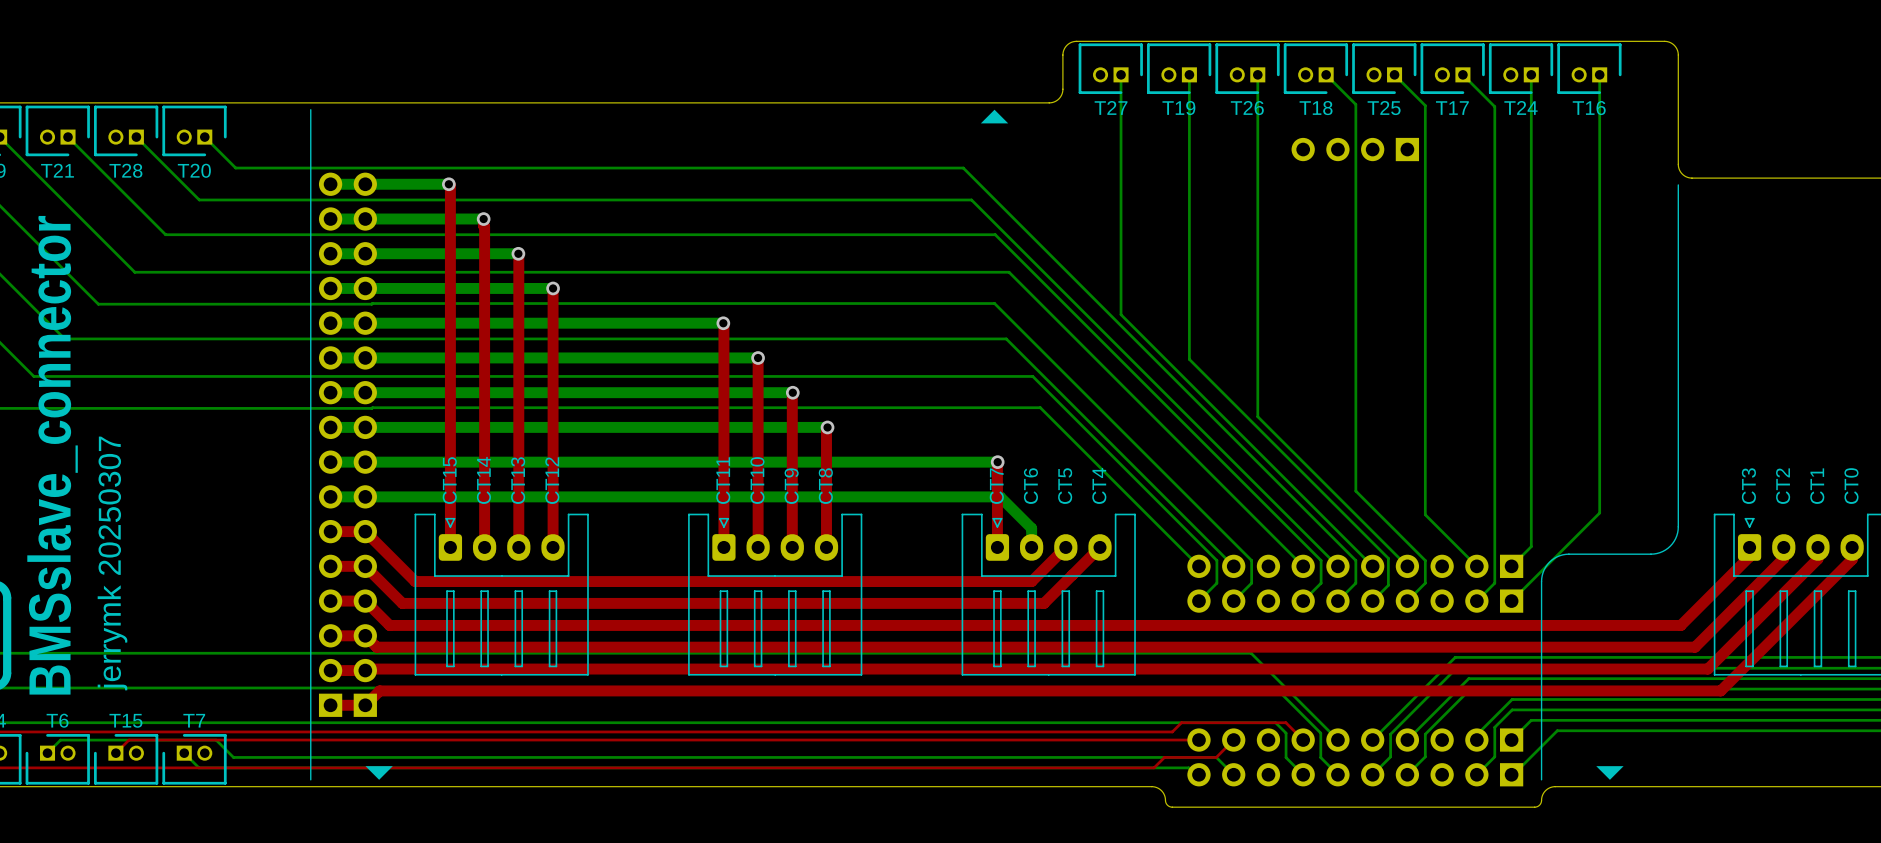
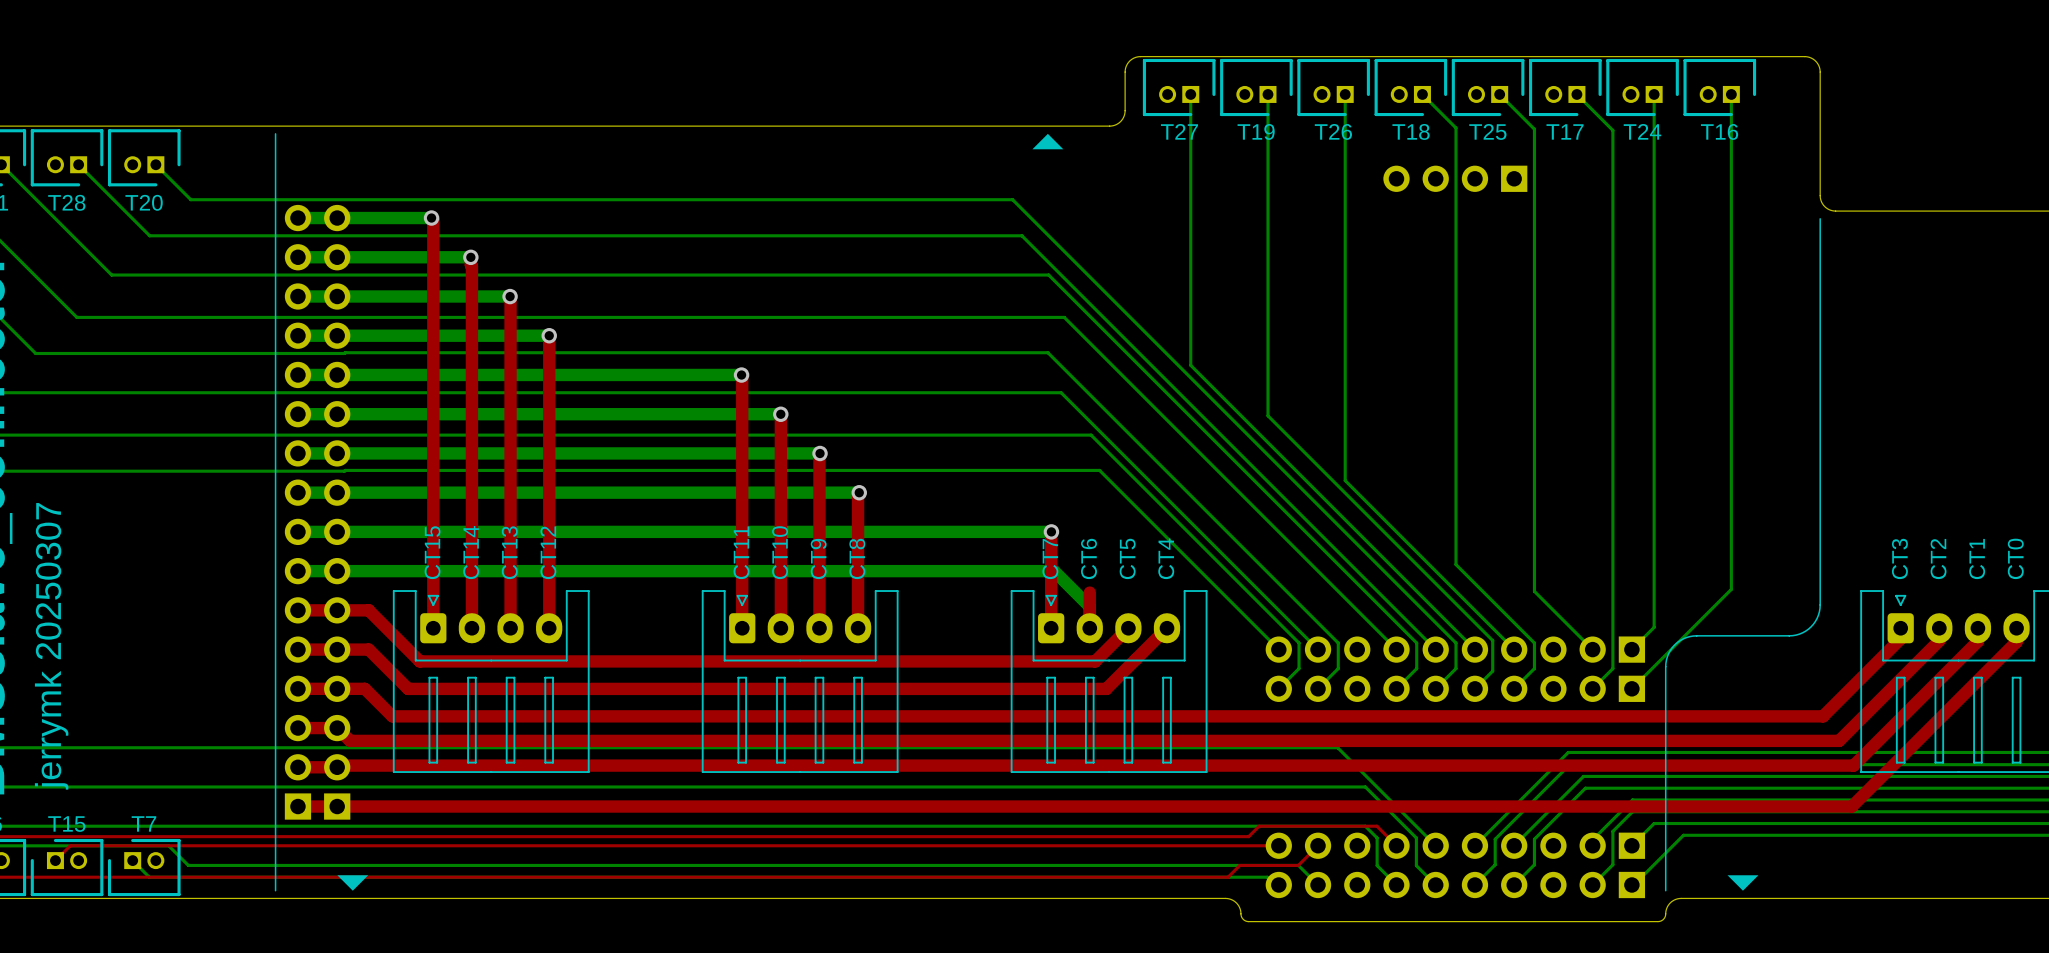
top track: none -> (1089, 592) (1089, 628)
top track: (365, 531) (415, 581) (1031, 581) (1036, 576) -> (337, 610) (368, 610) (419, 661) (1095, 661)
top track: (365, 566) (402, 603) (1044, 603) (1046, 601) -> (337, 649) (368, 649) (408, 688) (1106, 688)
top track: (365, 601) (389, 625) (414, 625) -> (337, 688) (364, 688) (392, 716)
top track: (1720, 690) (379, 690) (365, 705) -> (1868, 790) (1851, 806) (337, 806)

